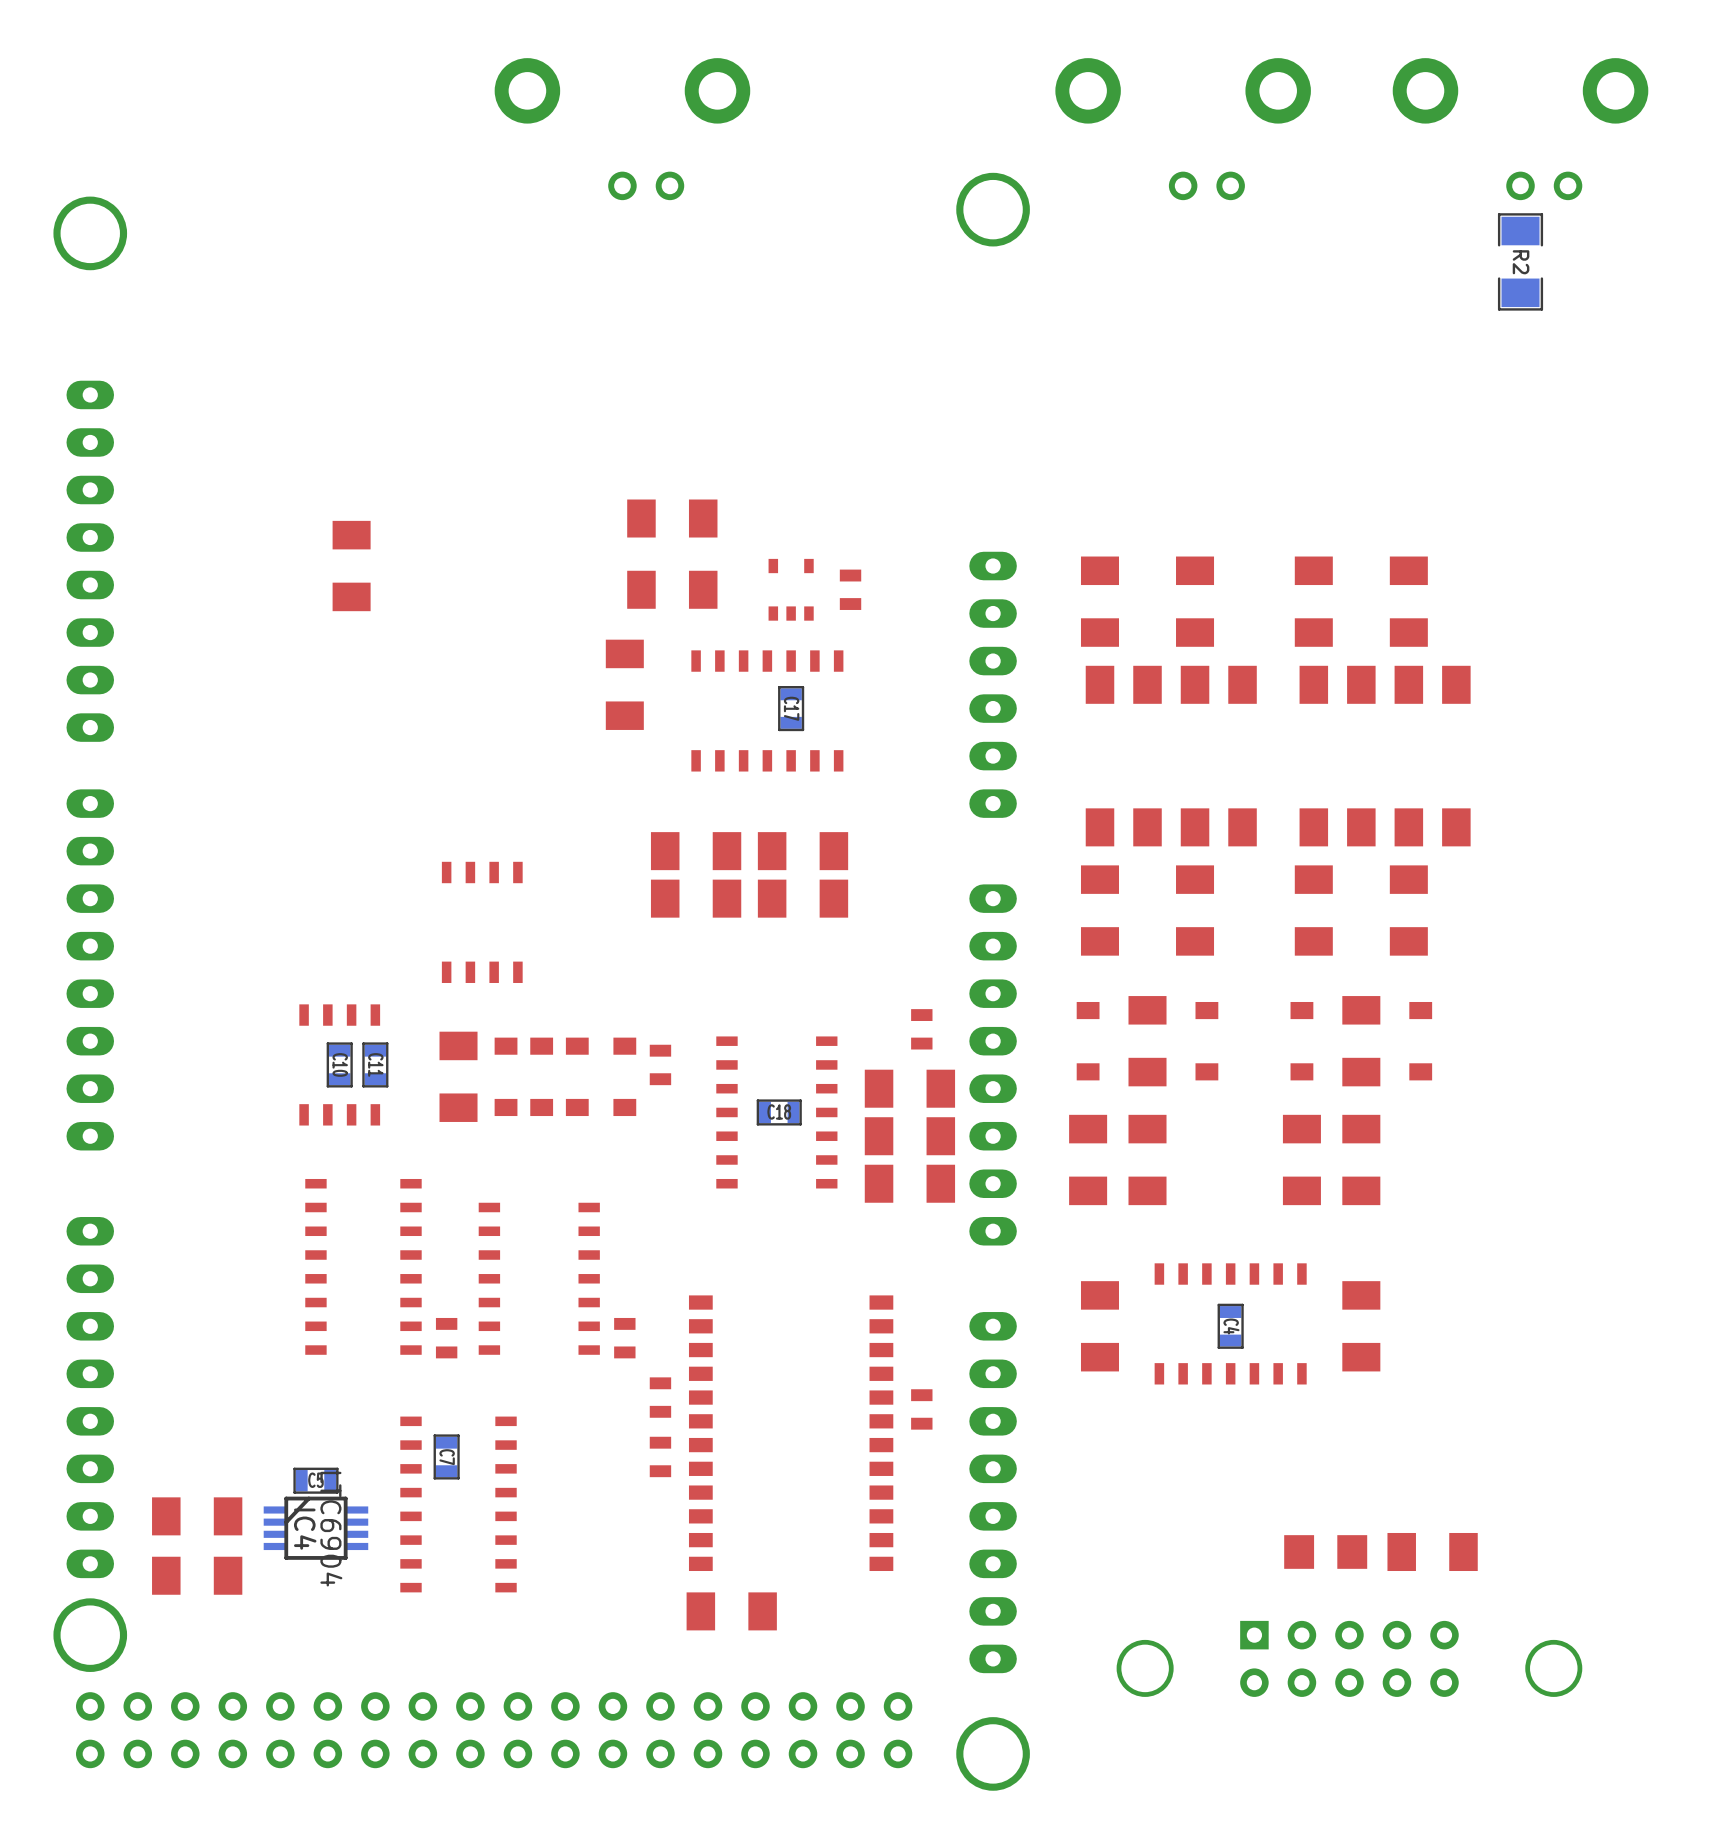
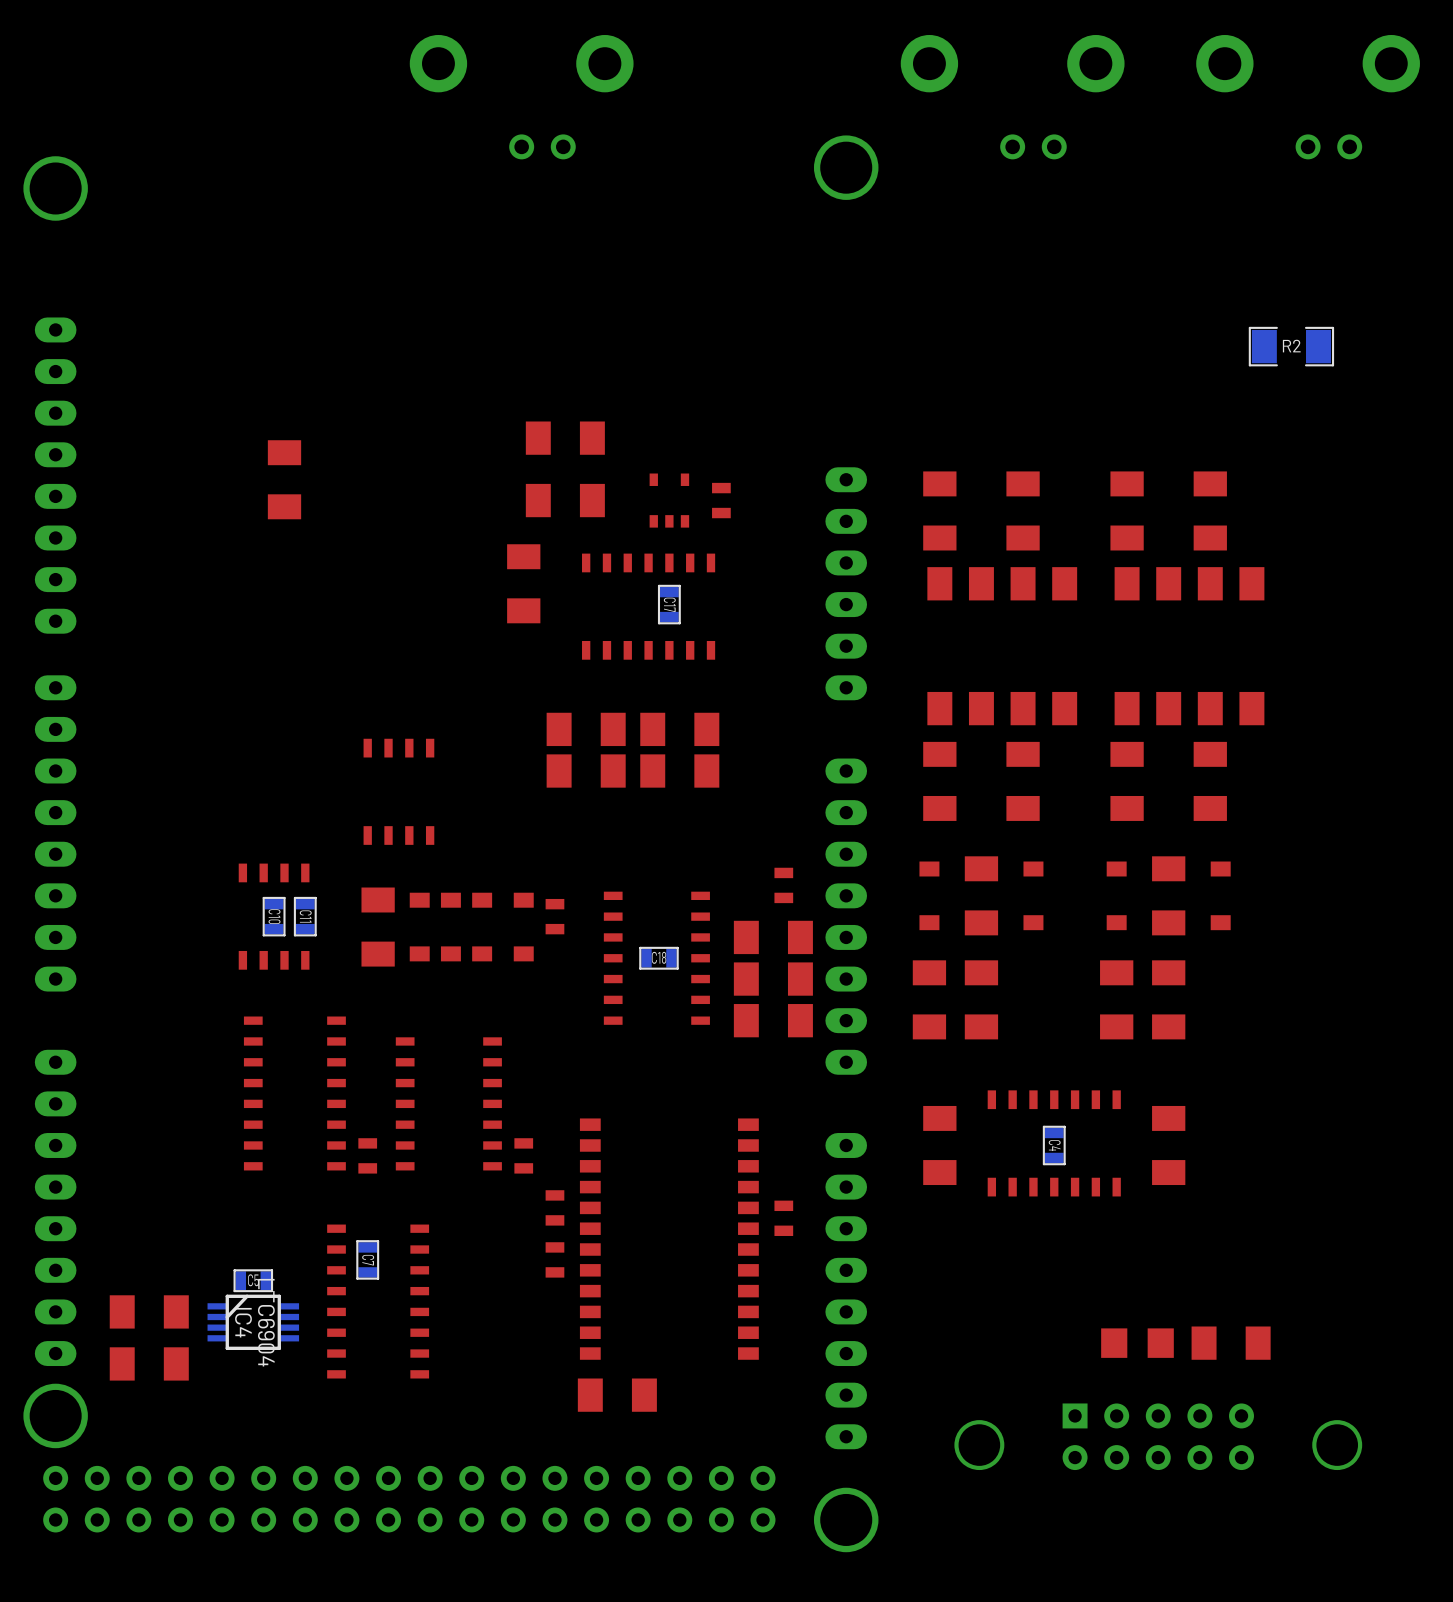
R2 rotation: 0° (1520, 261) -> 90° clockwise (1291, 346)
R2 position: (1520, 261) -> (1291, 346)

